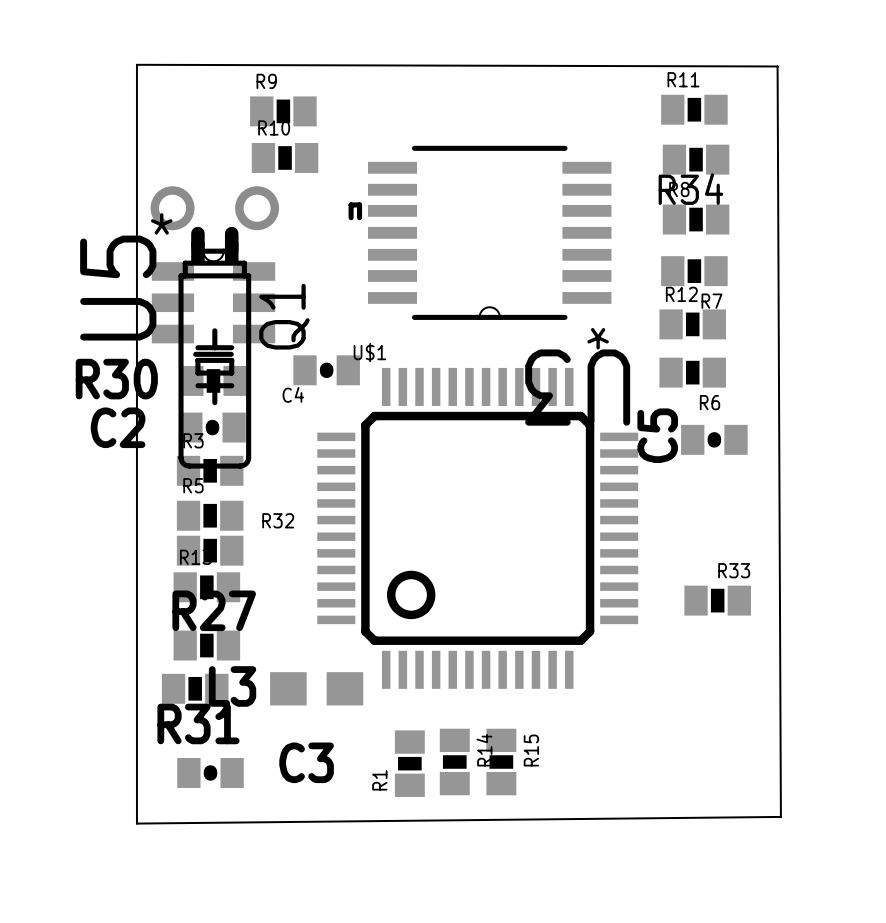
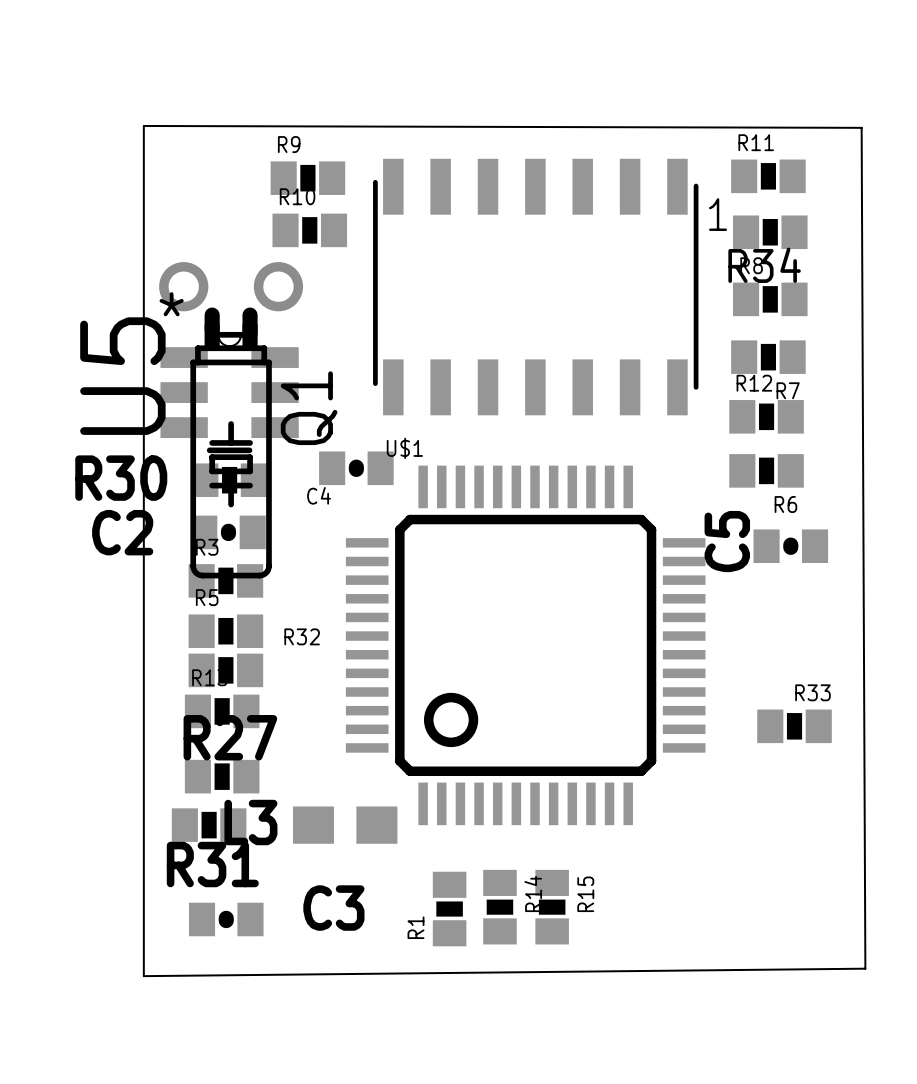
part: none -> (535, 287)
U3: (480, 232) -> none

